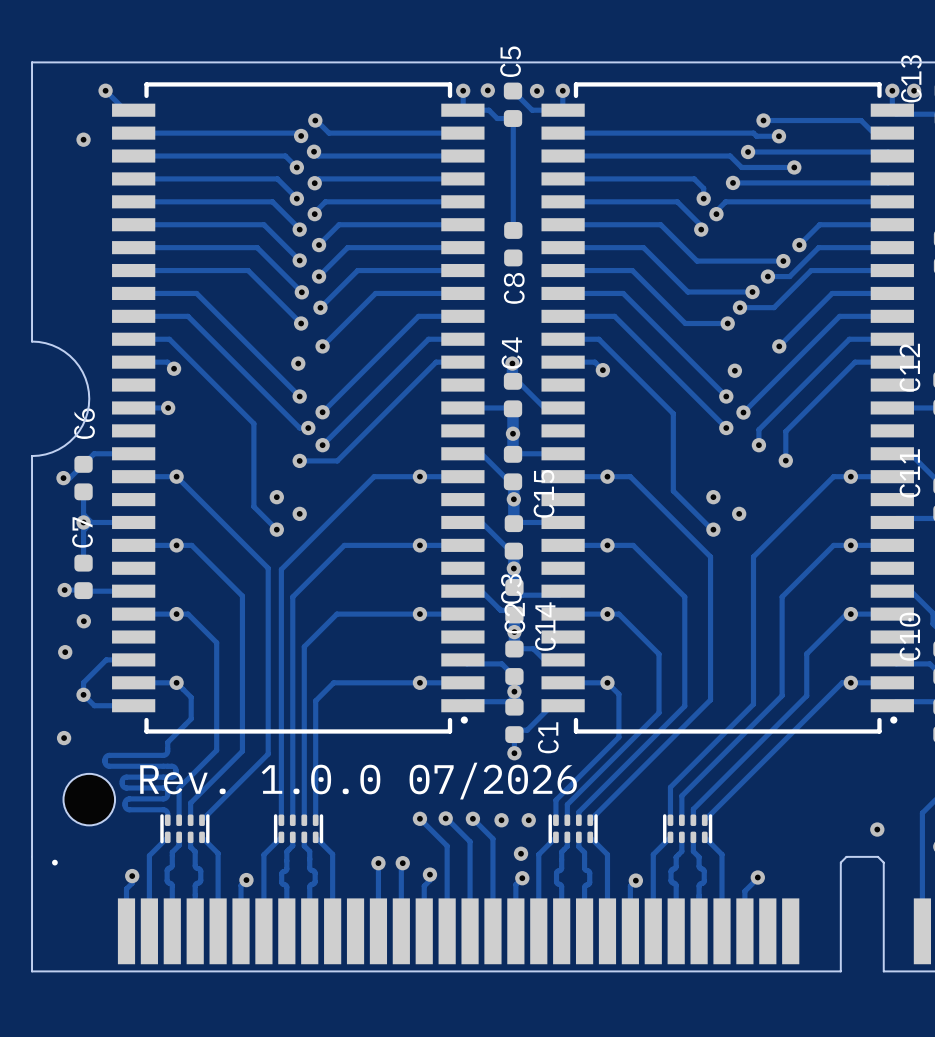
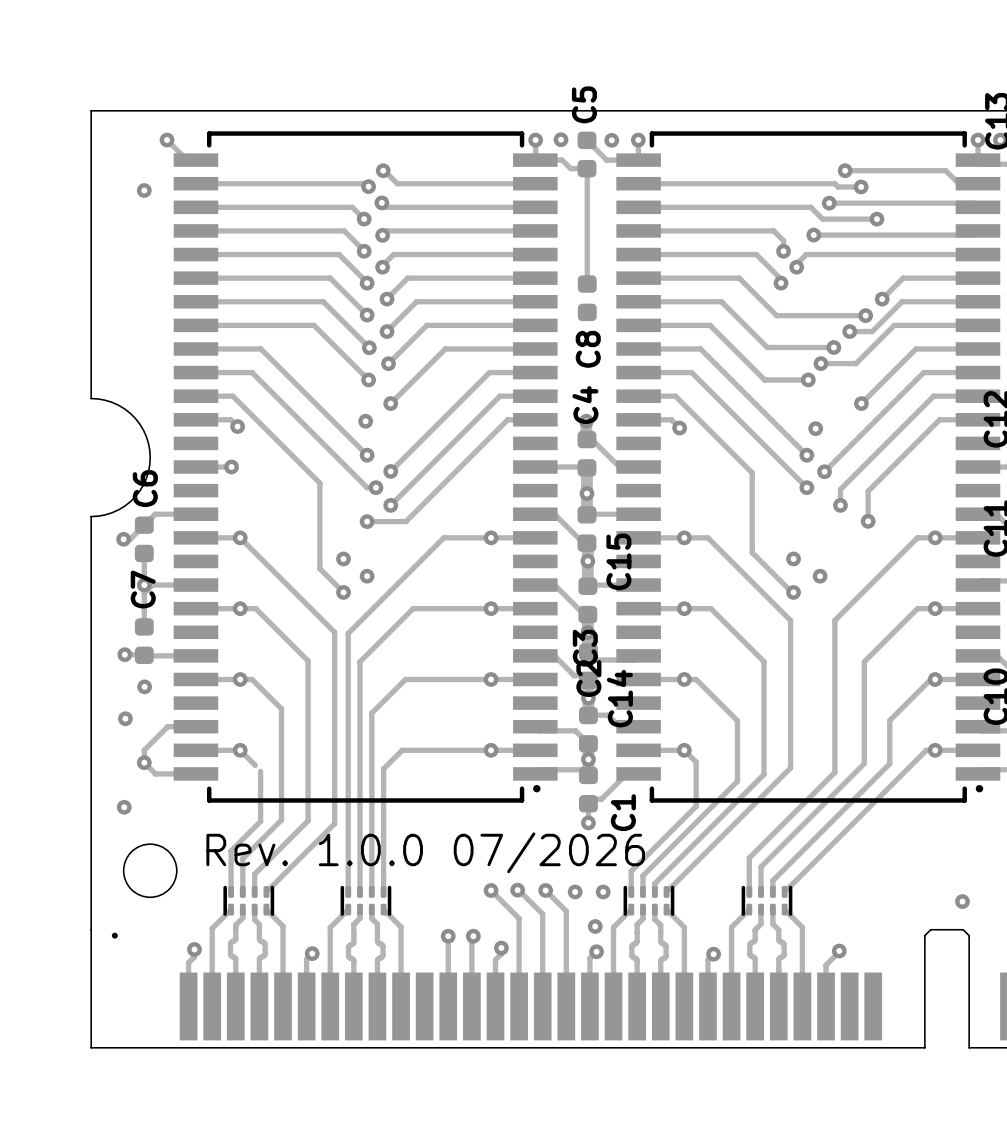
track: (191, 697) (191, 718) (167, 742) (166, 754) (108, 755) (105, 758) (105, 763) (108, 766) (173, 766) (175, 773) (172, 776) (125, 777) (122, 780) (122, 785) (125, 787) (163, 788) (167, 792) -> (260, 771) (260, 821) (231, 850) (231, 863)
track: (167, 794) (164, 798) (128, 798) (125, 803) (128, 809) (163, 809) (167, 814) -> (231, 865) (231, 885)

